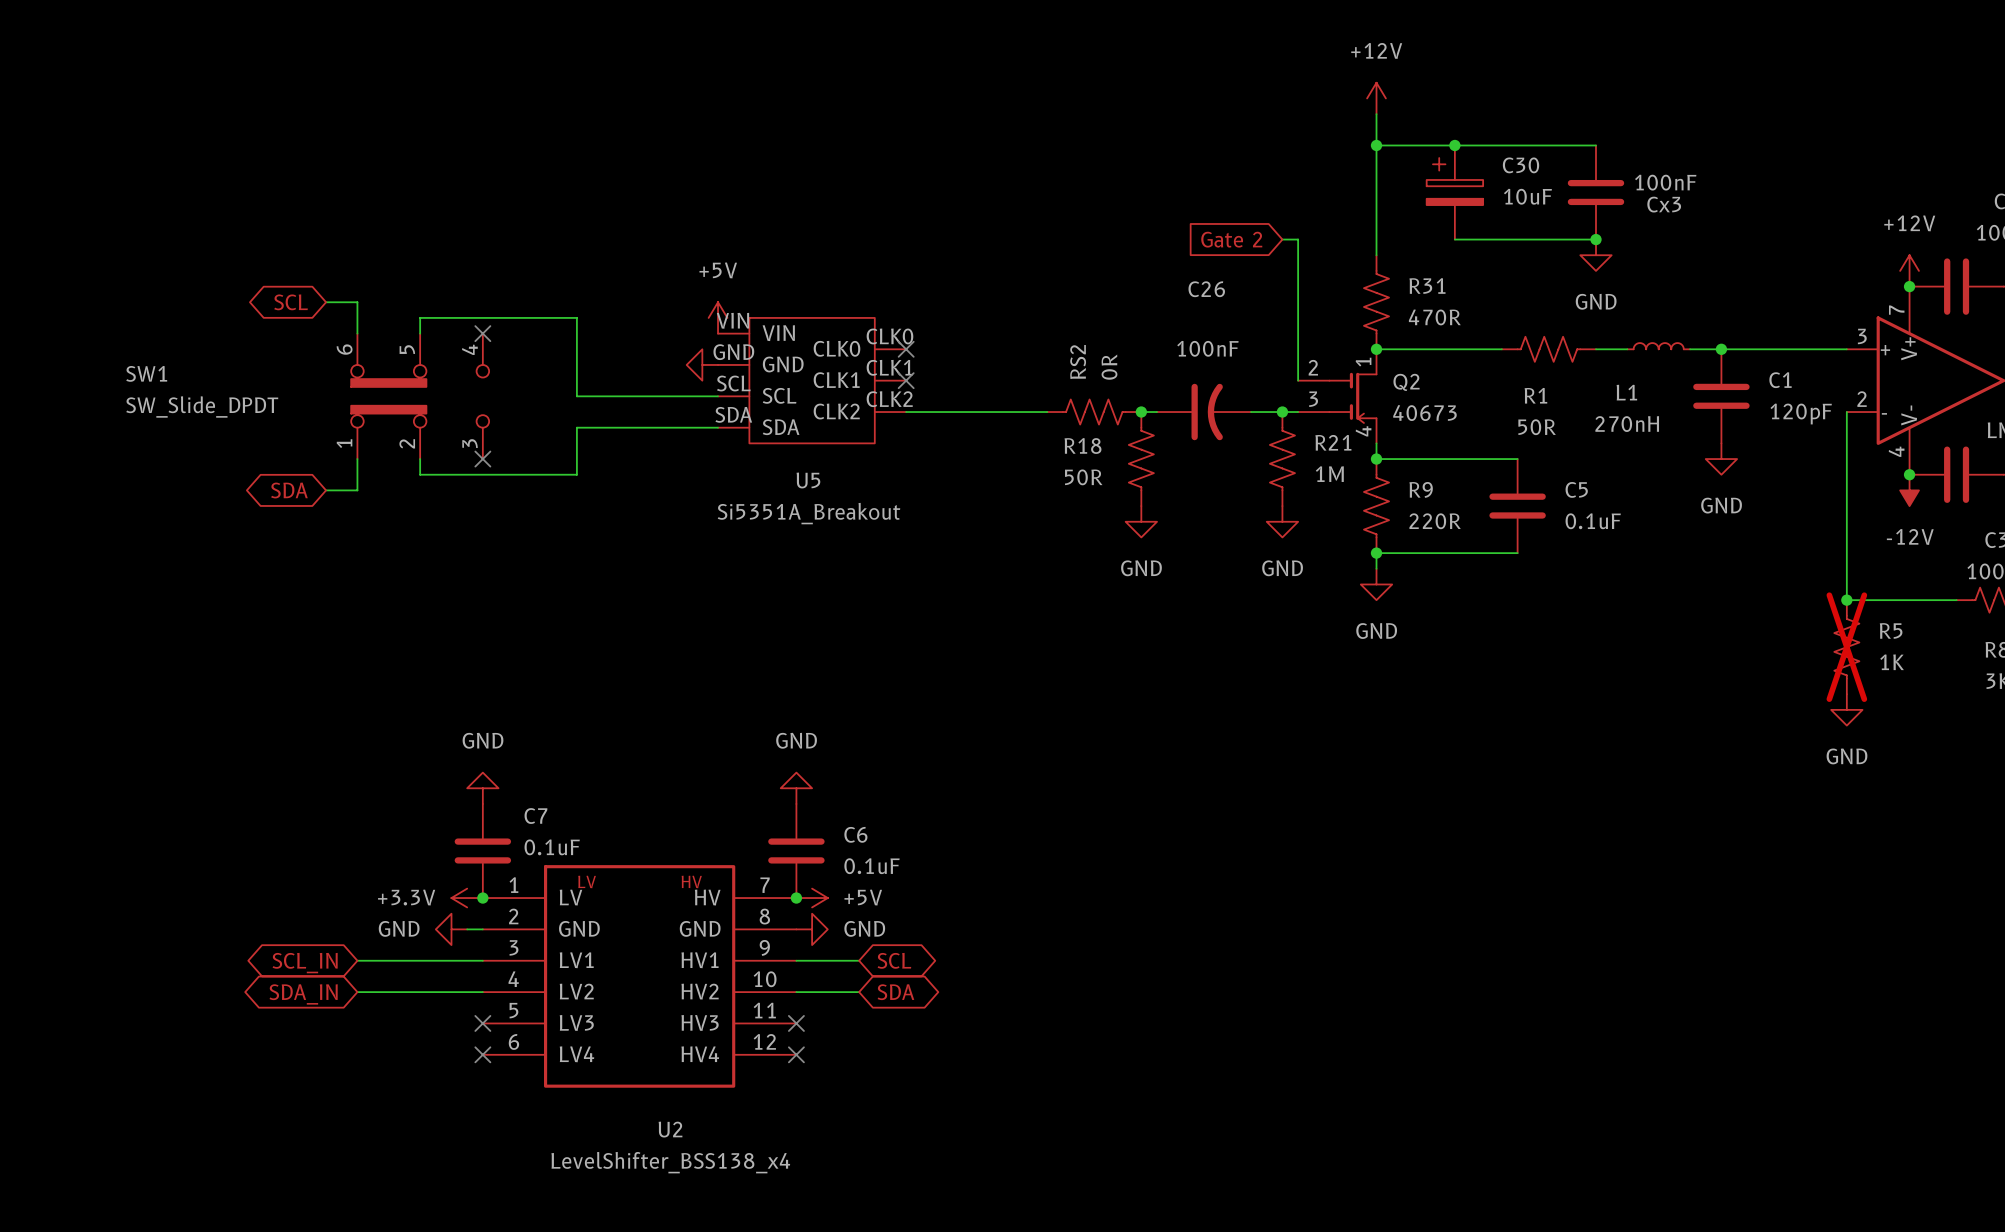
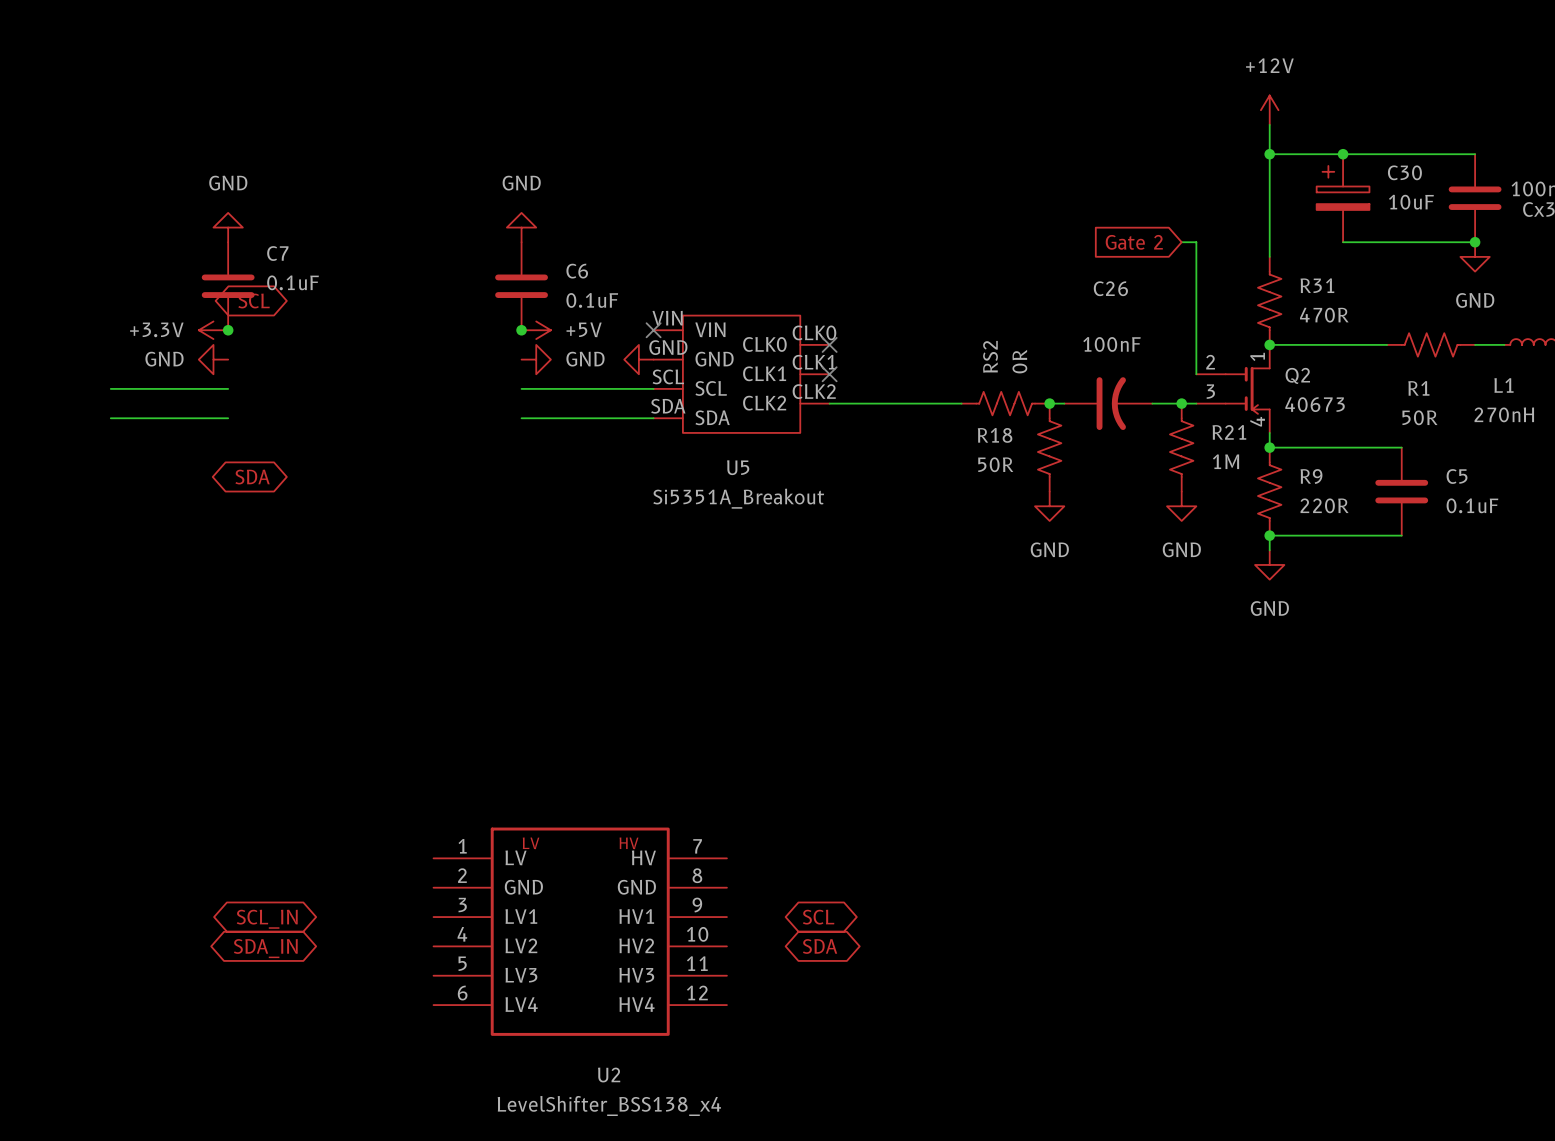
power symbol: none -> GND (228, 227)
power symbol: none -> GND (521, 227)
wire: (326, 302) (357, 302) (357, 333) -> none
power symbol rotation: 0° (718, 317) -> 90° clockwise (536, 330)
power symbol position: +5V (718, 317) -> +5V (536, 330)
power symbol: none -> +3.3V (213, 330)
junction: none -> (228, 330)
wire: (420, 333) (420, 317) (576, 317) (576, 396) -> none
no-connect mark: (482, 333) -> none
junction: none -> (521, 330)
no-connect mark: none -> (653, 330)
power symbol: none -> GND (213, 359)
power symbol: none -> GND (536, 359)
wire: none -> (110, 388) (228, 388)
SW1: SW_Slide_DPDT (420, 396) -> none
wire: none -> (110, 418) (228, 418)
wire: (576, 427) (576, 474) (420, 474) (420, 459) -> none
wire: (357, 459) (357, 490) (326, 490) -> none
no-connect mark: (482, 459) -> none
power symbol: GND (482, 788) -> none
power symbol: GND (796, 788) -> none
C7 position: (482, 851) -> (228, 286)
C6 position: (796, 851) -> (521, 286)
power symbol: +3.3V (467, 898) -> none
junction: (482, 898) -> none
junction: (796, 898) -> none
power symbol: +5V (812, 898) -> none
power symbol: GND (451, 929) -> none
wire: (467, 929) (482, 929) -> none
power symbol: GND (812, 929) -> none
wire: (357, 960) (482, 960) -> none
wire: (796, 960) (859, 960) -> none
wire: (357, 992) (482, 992) -> none
wire: (796, 992) (859, 992) -> none
no-connect mark: (482, 1023) -> none
no-connect mark: (796, 1023) -> none
no-connect mark: (482, 1054) -> none
no-connect mark: (796, 1054) -> none

